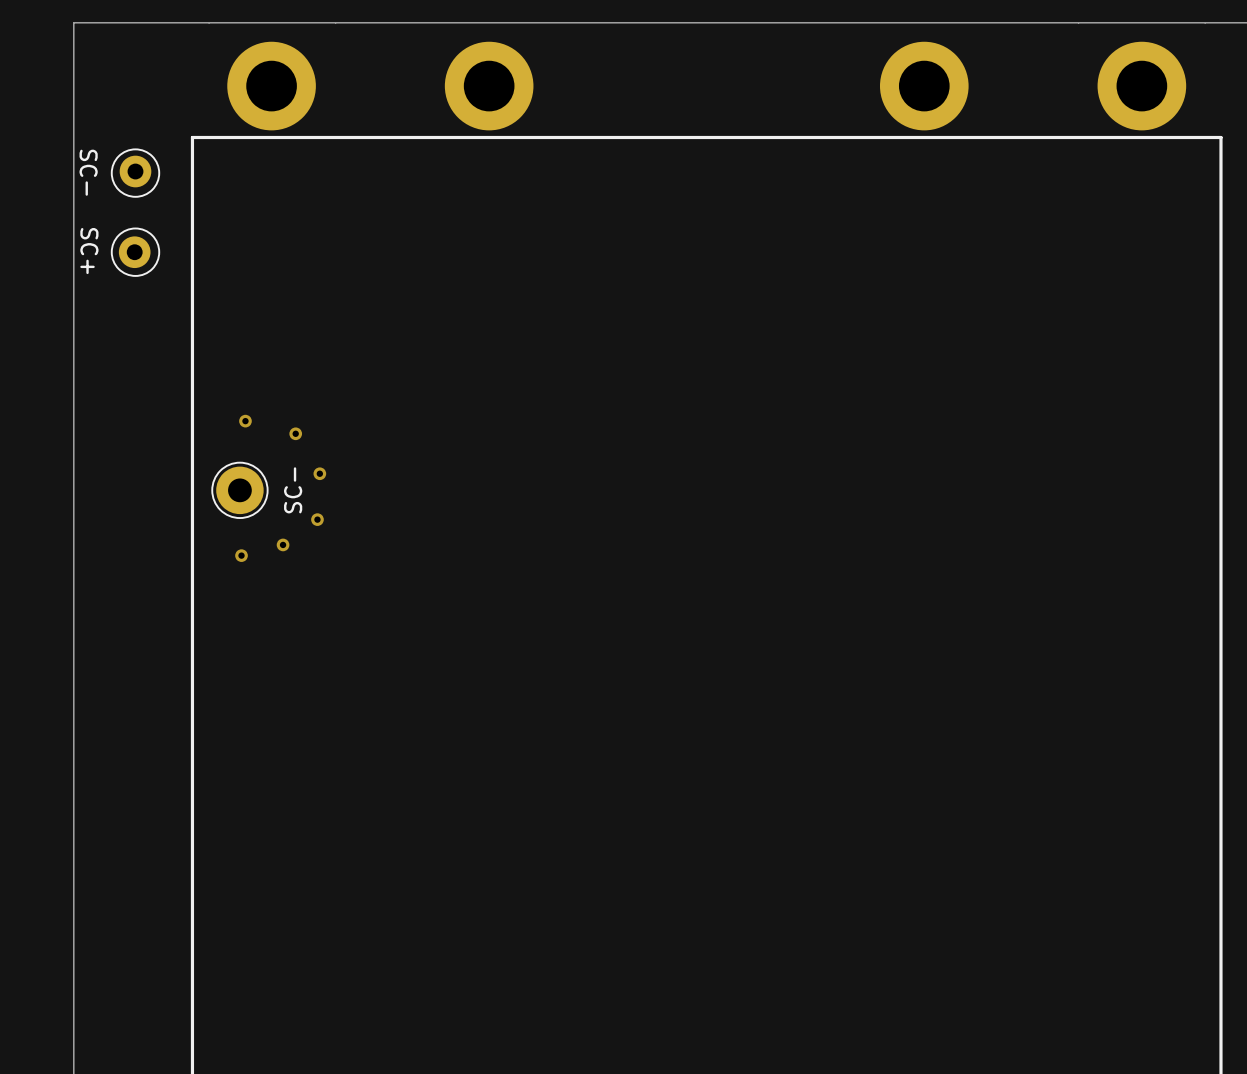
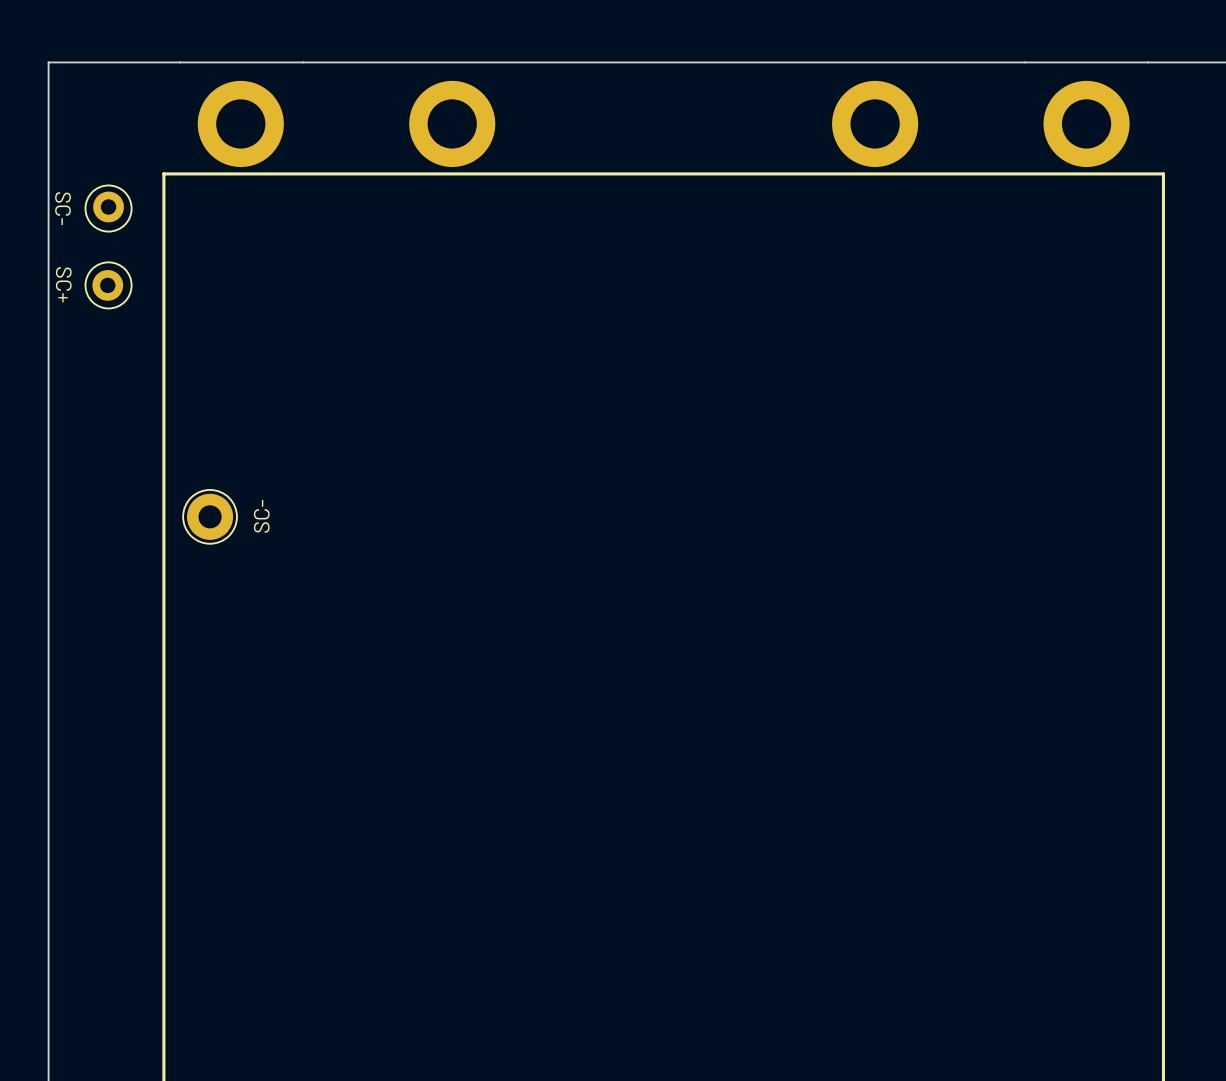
via: (245, 421) -> none
via: (295, 433) -> none
via: (319, 473) -> none
via: (317, 519) -> none
via: (283, 544) -> none
via: (241, 555) -> none

